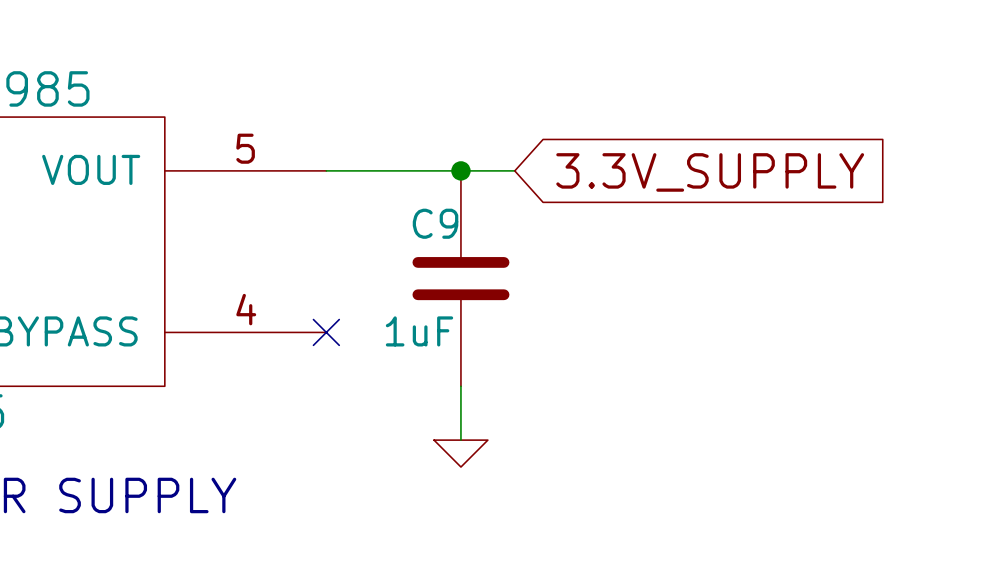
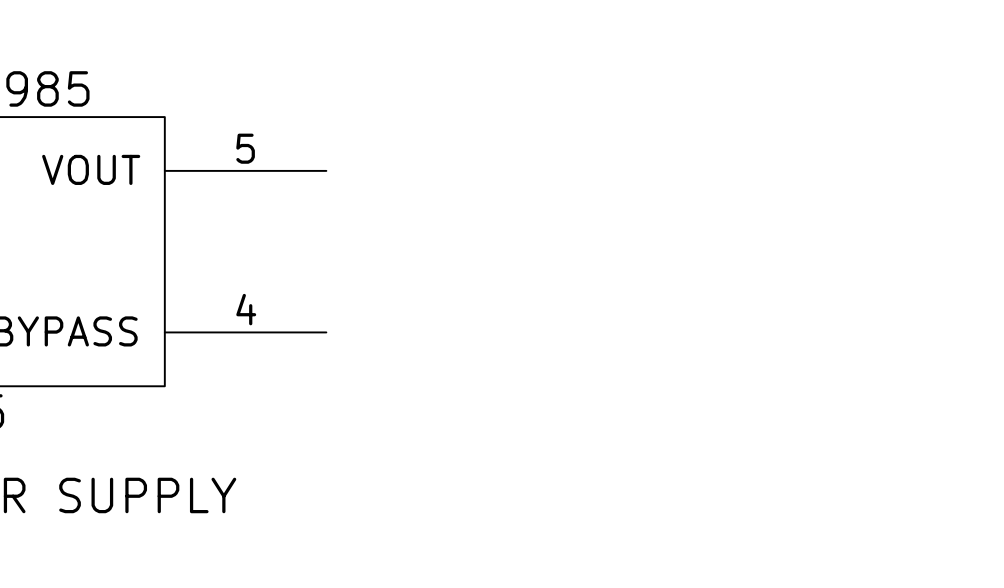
wire: (326, 170) (514, 170) -> none
junction: (460, 170) -> none
global label: 3.3V_SUPPLY (710, 172) -> none
C9: 1uF (460, 278) -> none
no-connect mark: (326, 332) -> none
wire: (460, 386) (460, 440) -> none
power symbol: (460, 453) -> none

